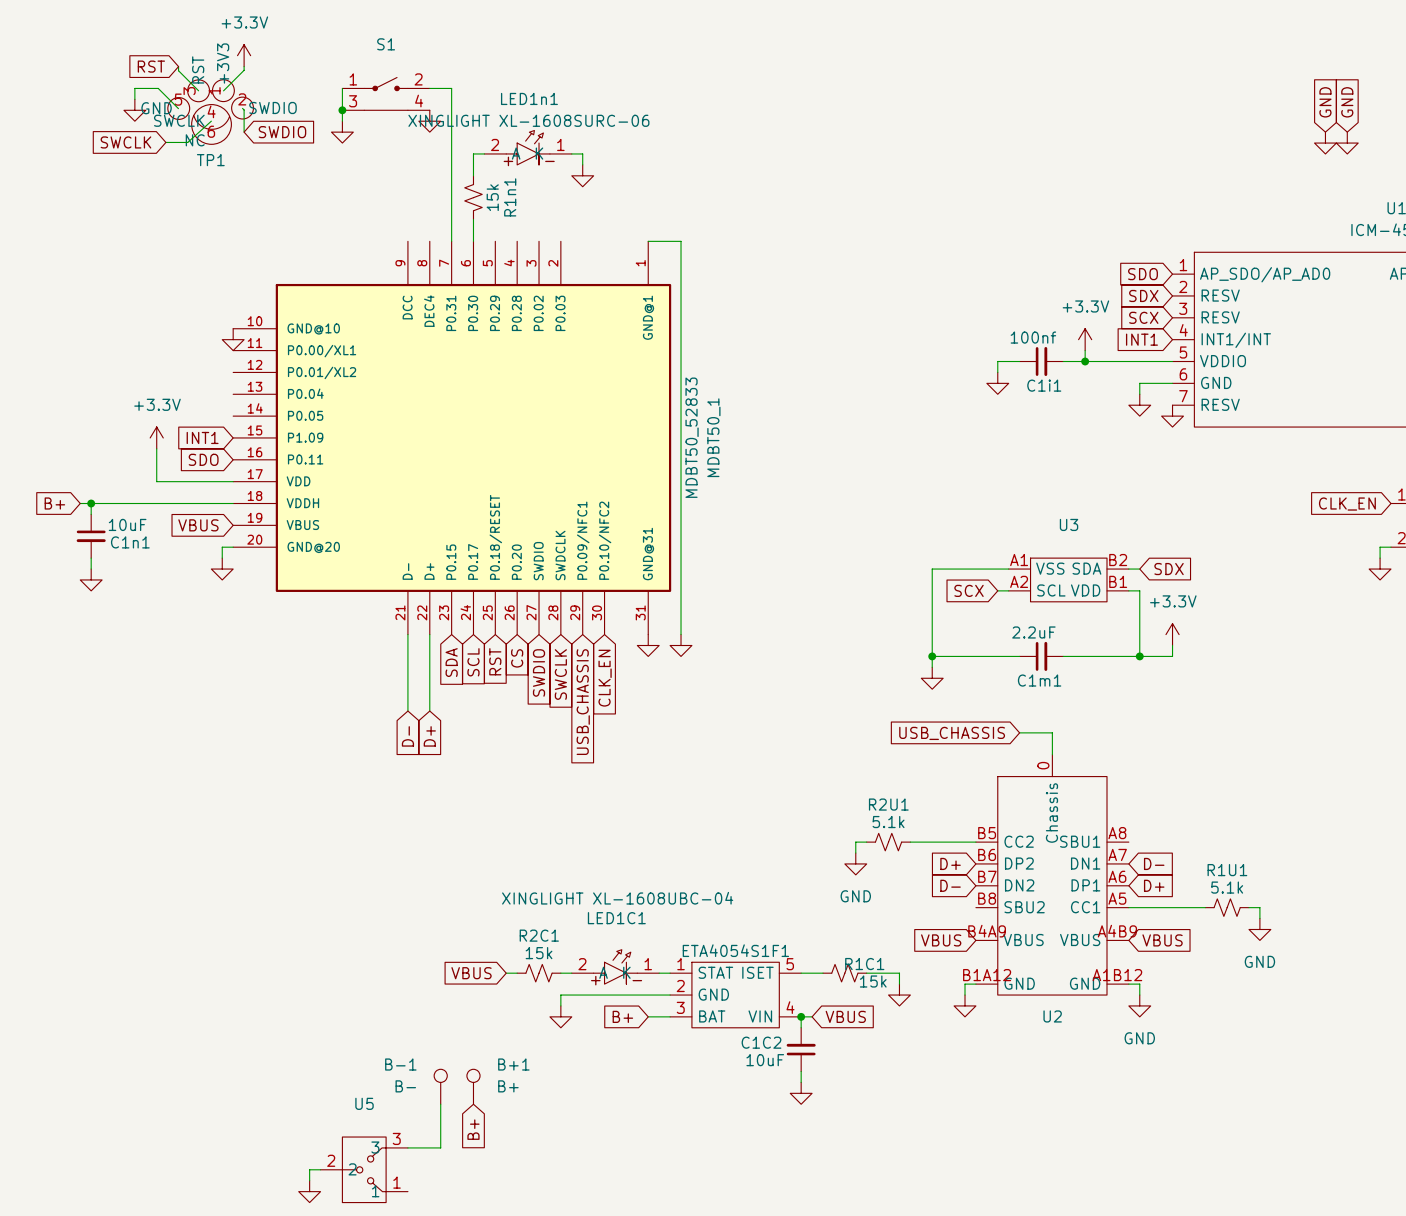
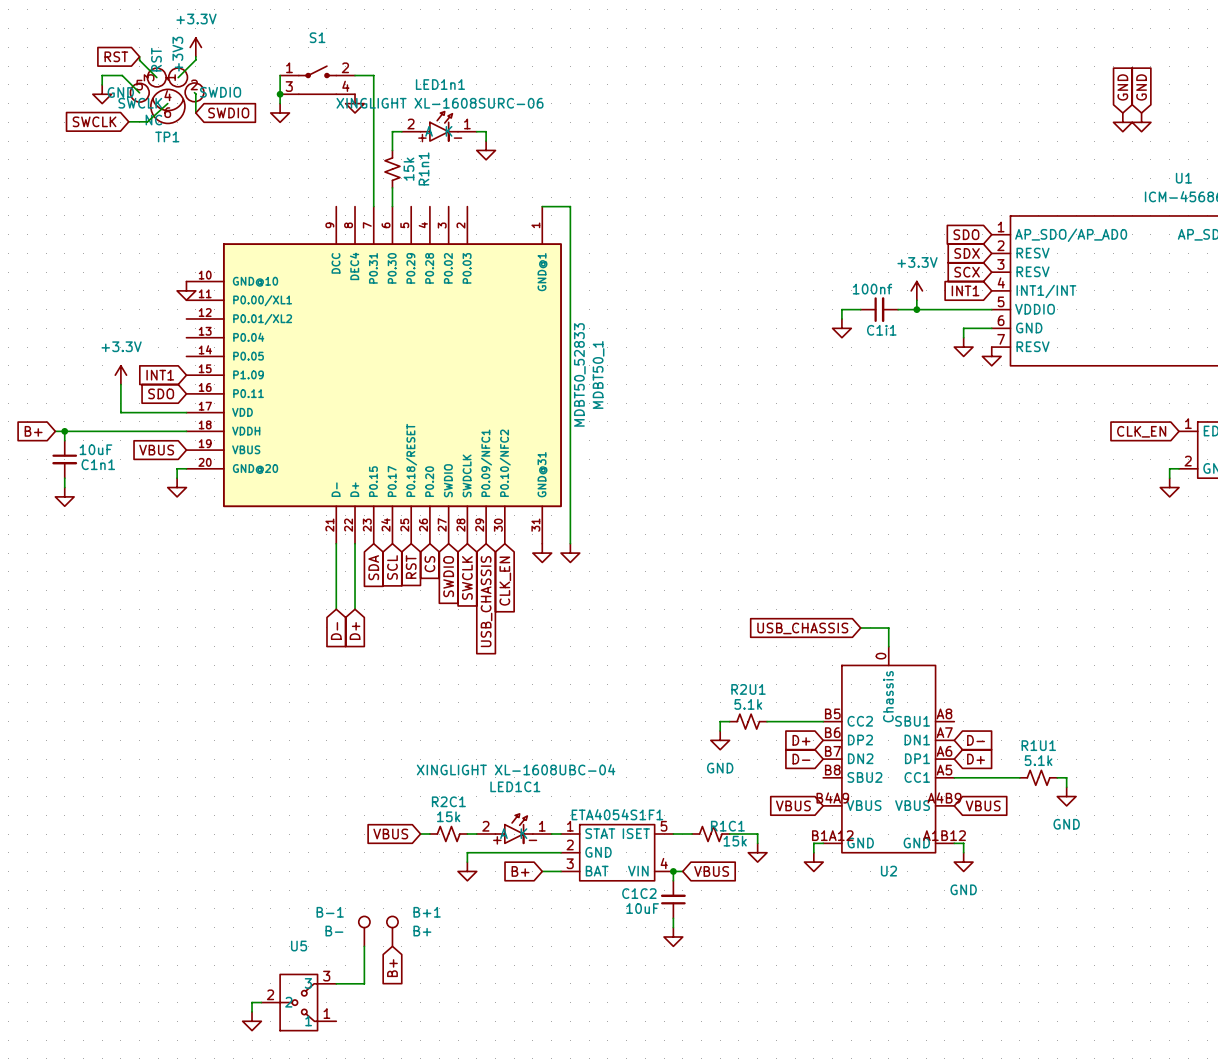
wire: (1008, 569) (932, 569) (932, 667) -> none
wire: (1128, 569) (1139, 569) -> none
global label: SDX (1169, 569) -> none
U3: (1068, 579) -> none
global label: SCX (969, 590) -> none
wire: (997, 590) (1008, 590) -> none
wire: (1128, 590) (1139, 590) (1139, 656) -> none
power symbol: +3.3V (1172, 634) -> none
wire: (1172, 645) (1172, 656) (1063, 656) -> none
wire: (932, 656) (1019, 656) -> none
junction: (932, 656) -> none
C1m1: 2.2uF (1041, 656) -> none
junction: (1139, 656) -> none
power symbol: (932, 678) -> none

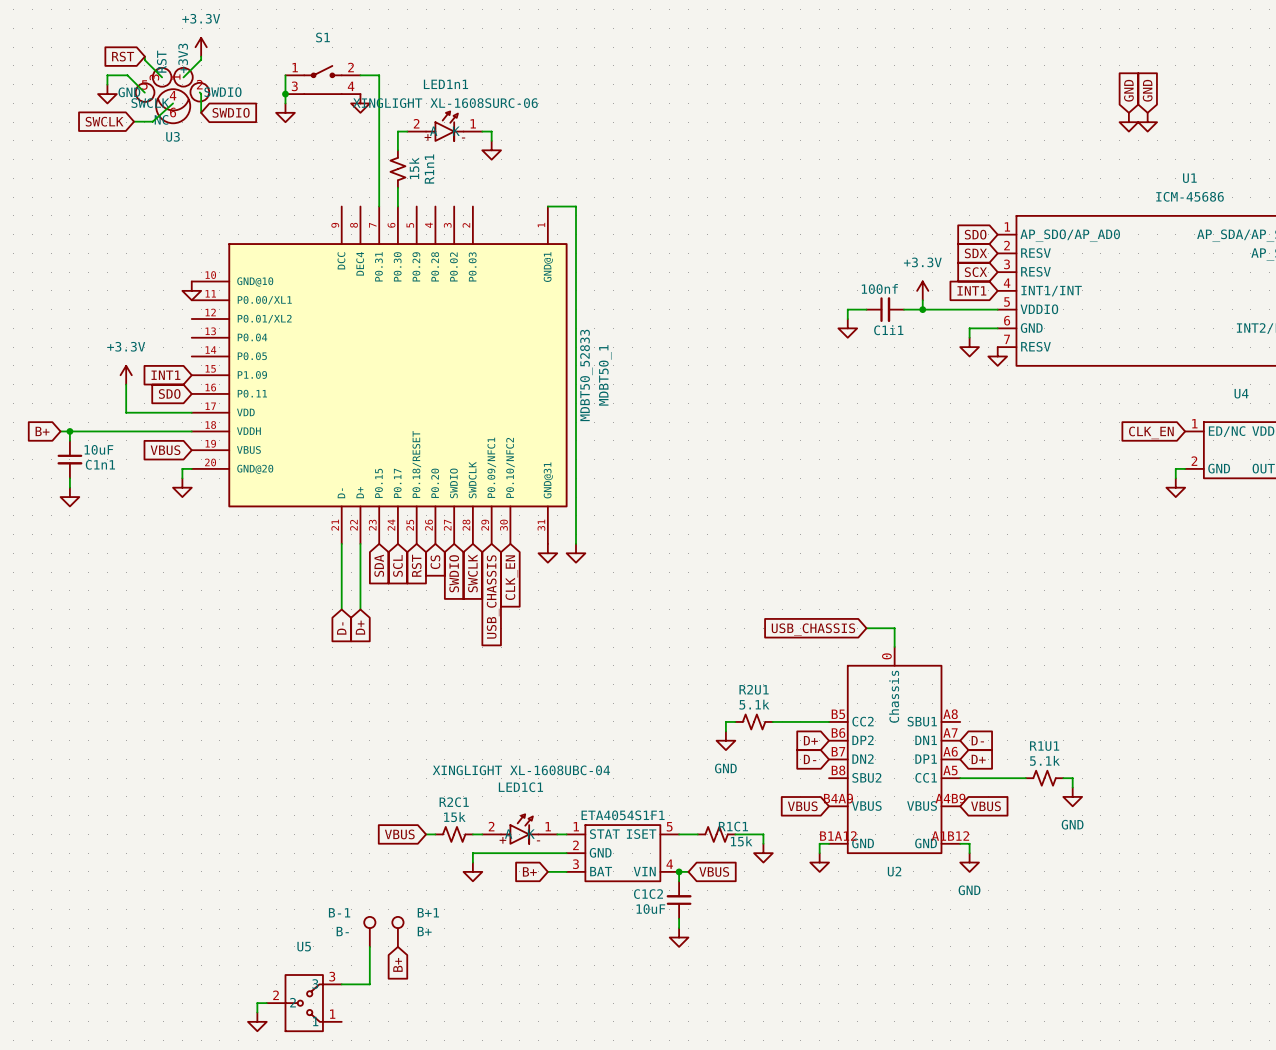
TP1 name: TP1 (167, 136) -> U3 (173, 136)

